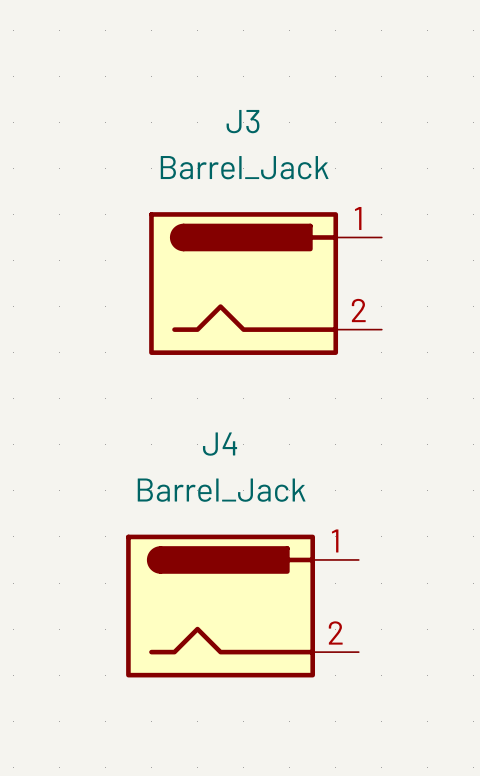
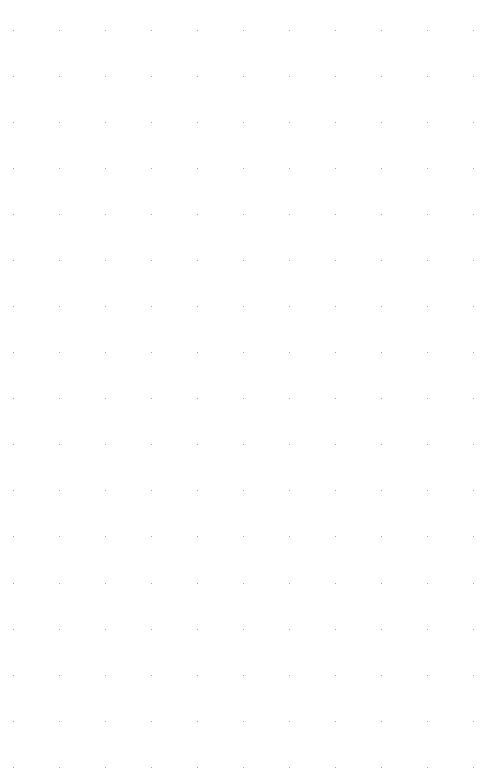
J3: Barrel_Jack (265, 283) -> none
J4: Barrel_Jack (242, 606) -> none

